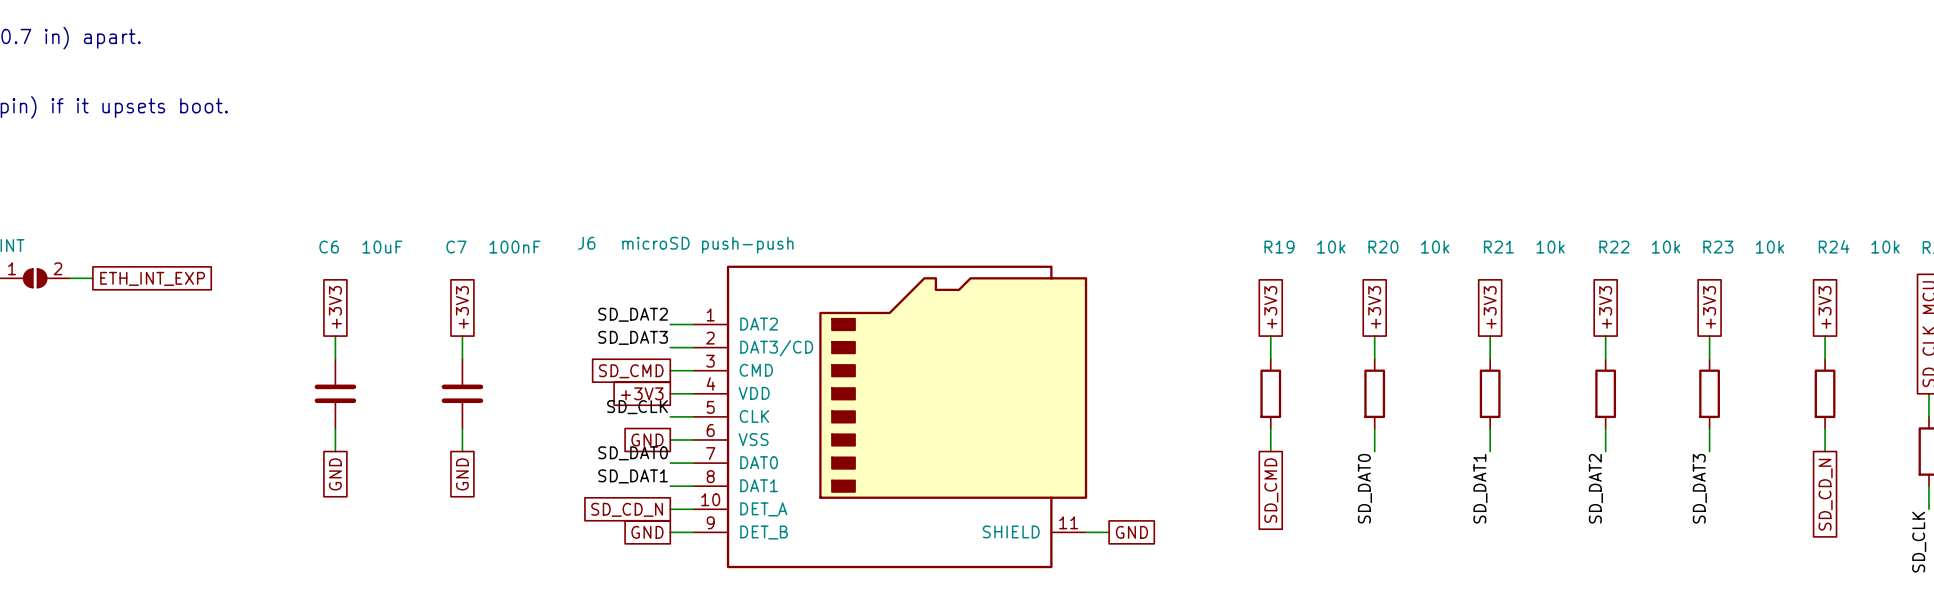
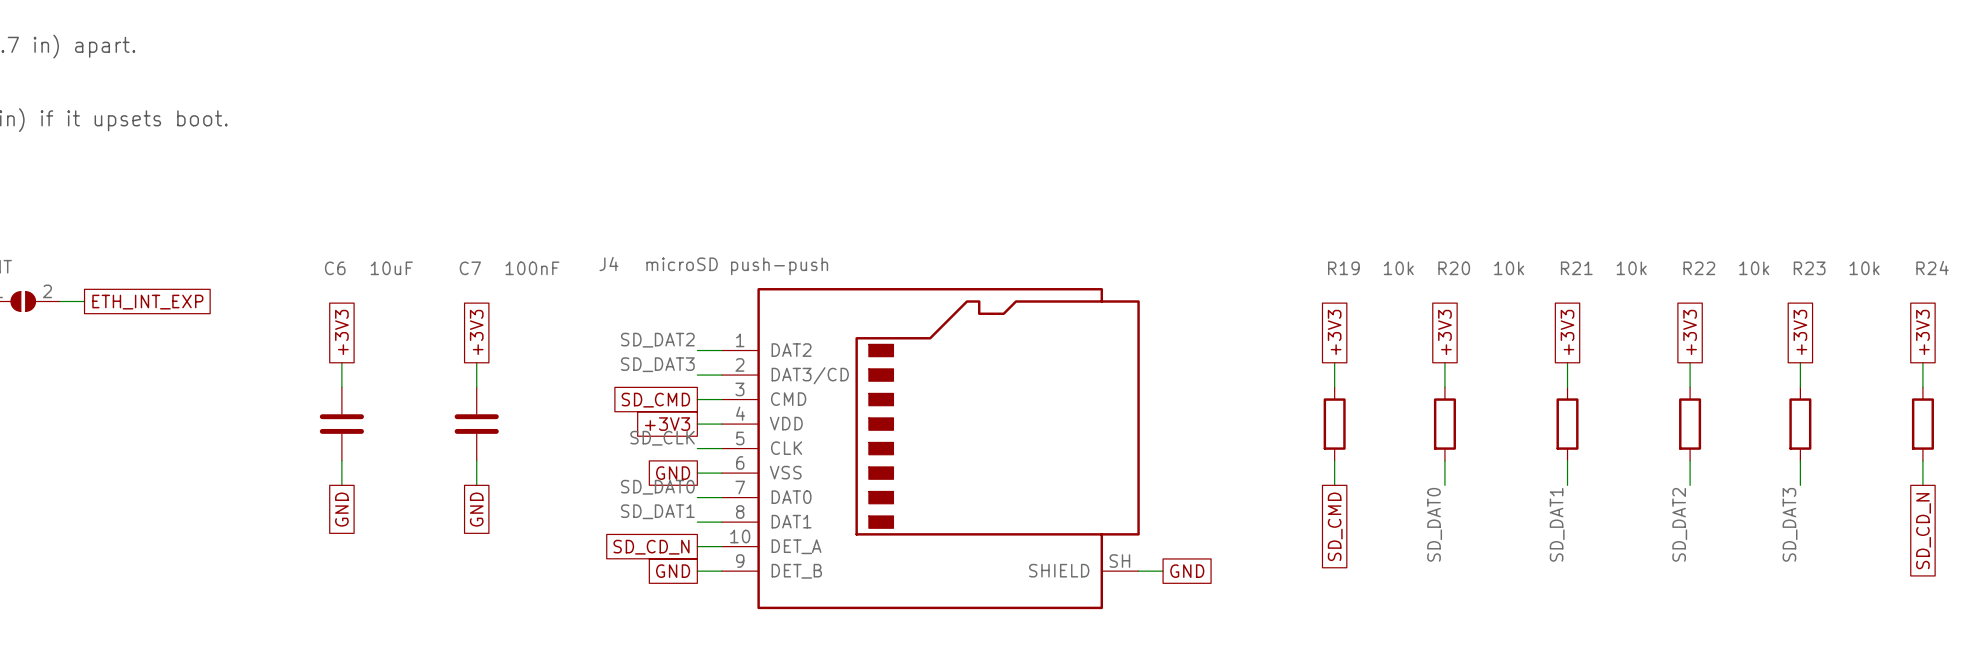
J6 name: J6 (586, 243) -> J4 (608, 263)
J6 pin number: 11 (1068, 522) -> SH (1119, 561)

